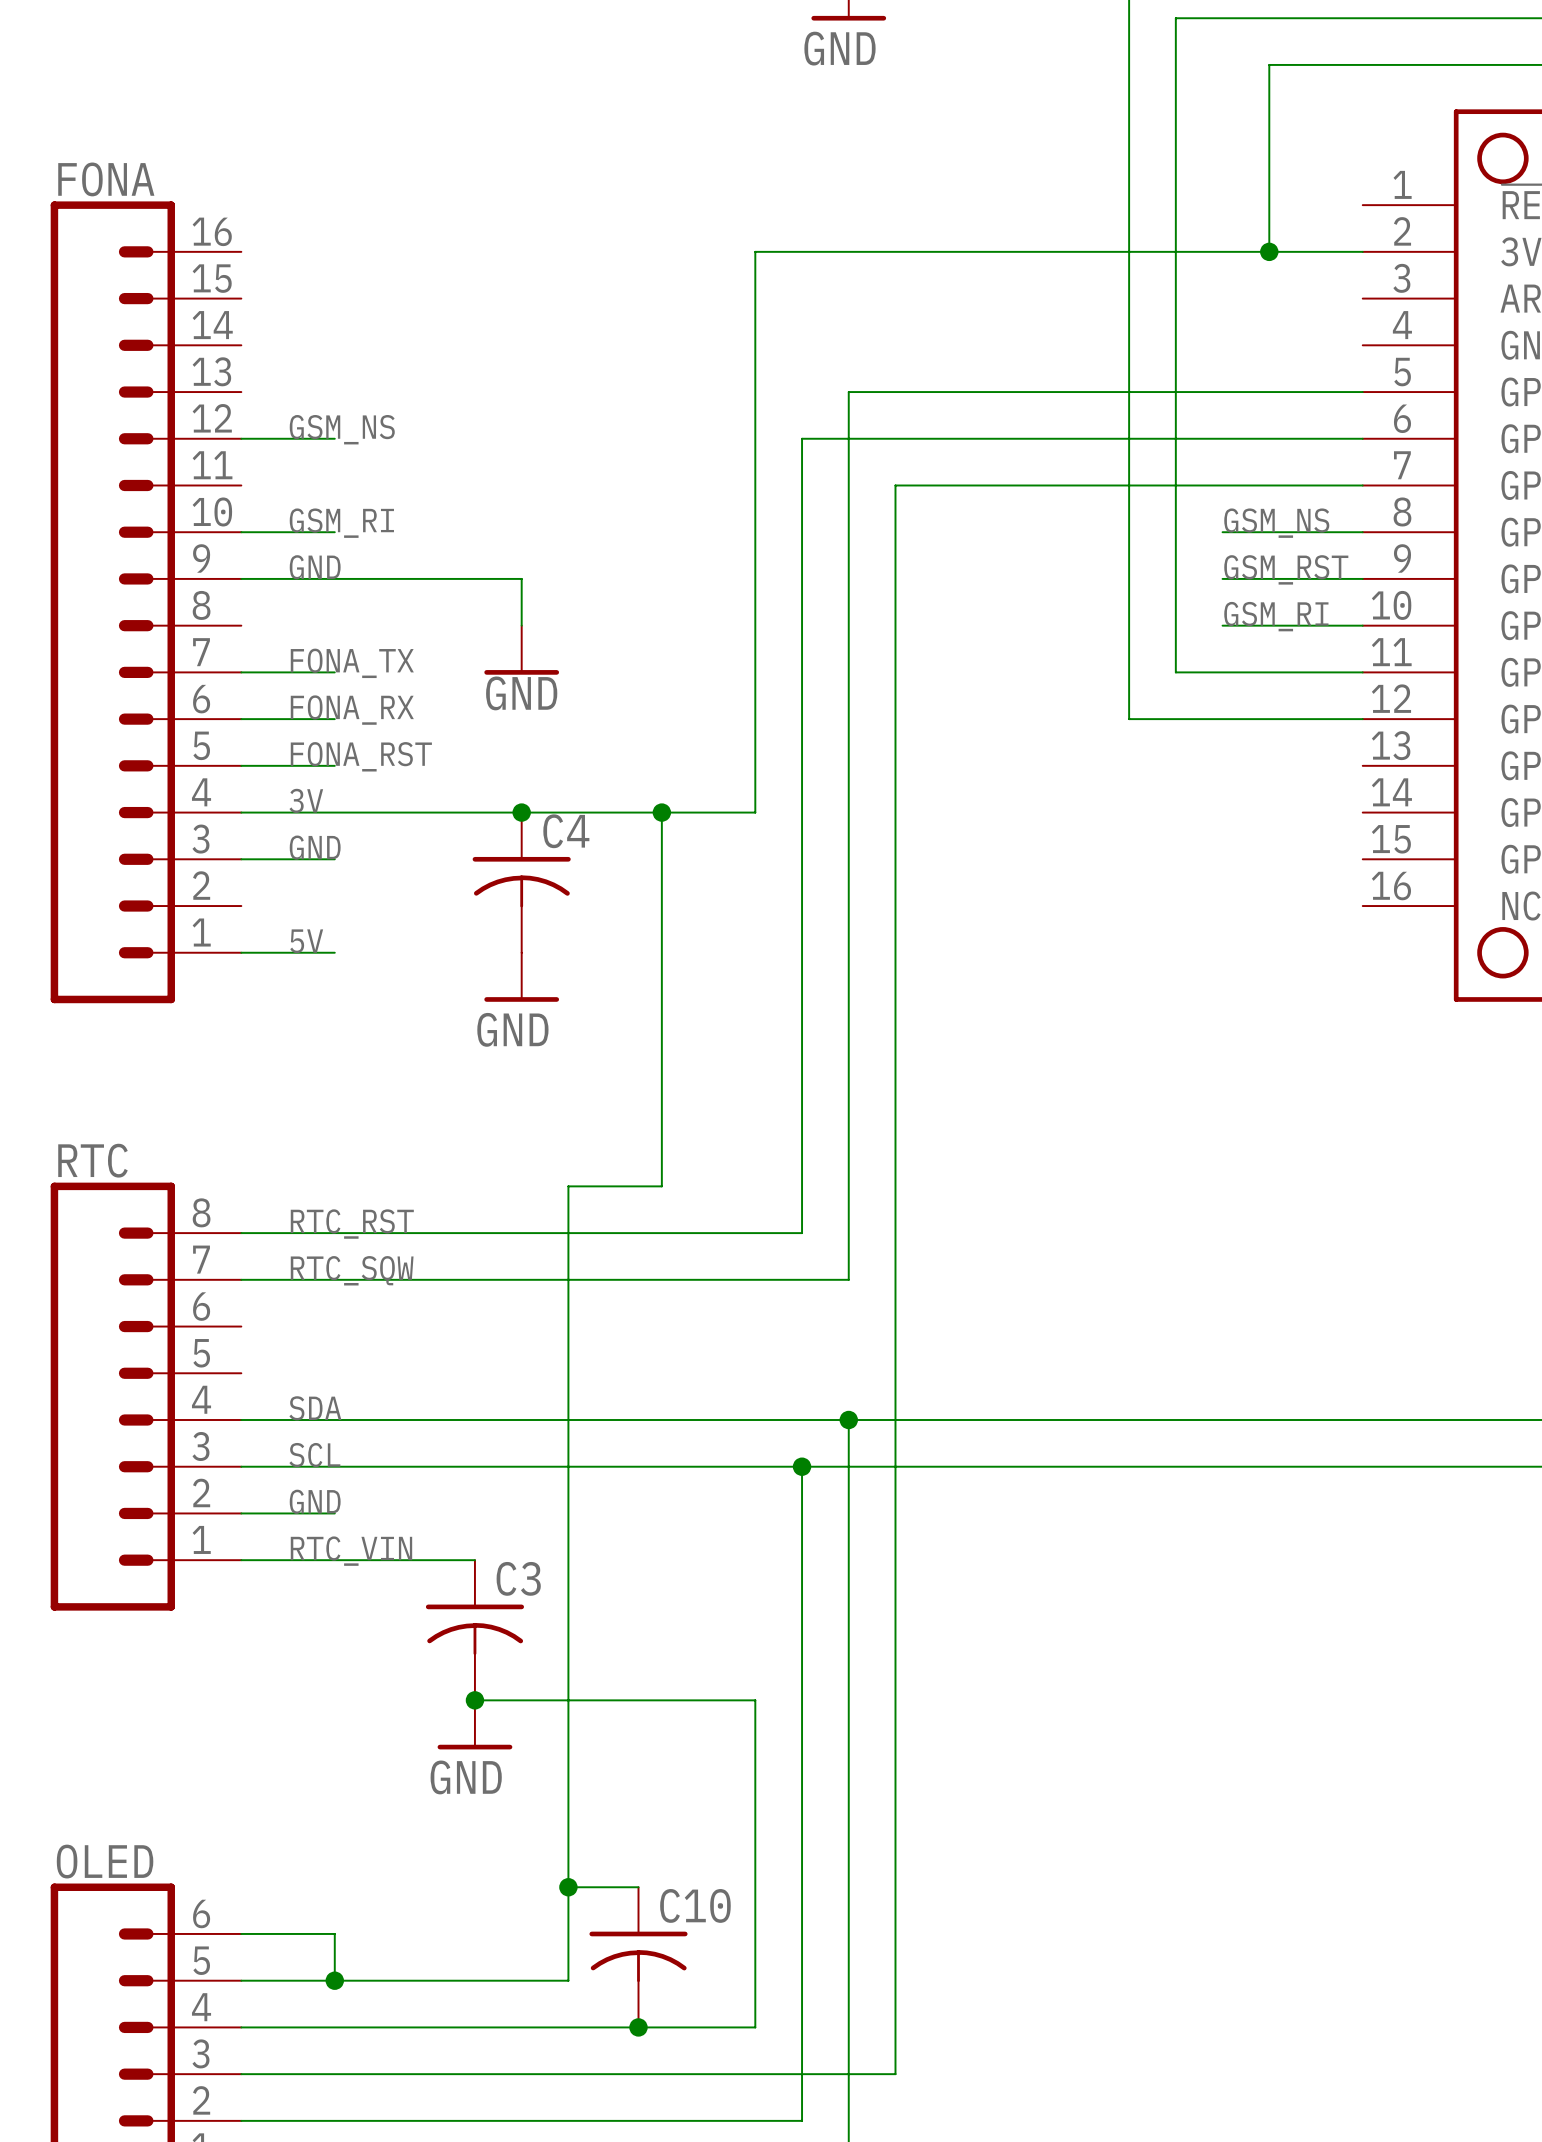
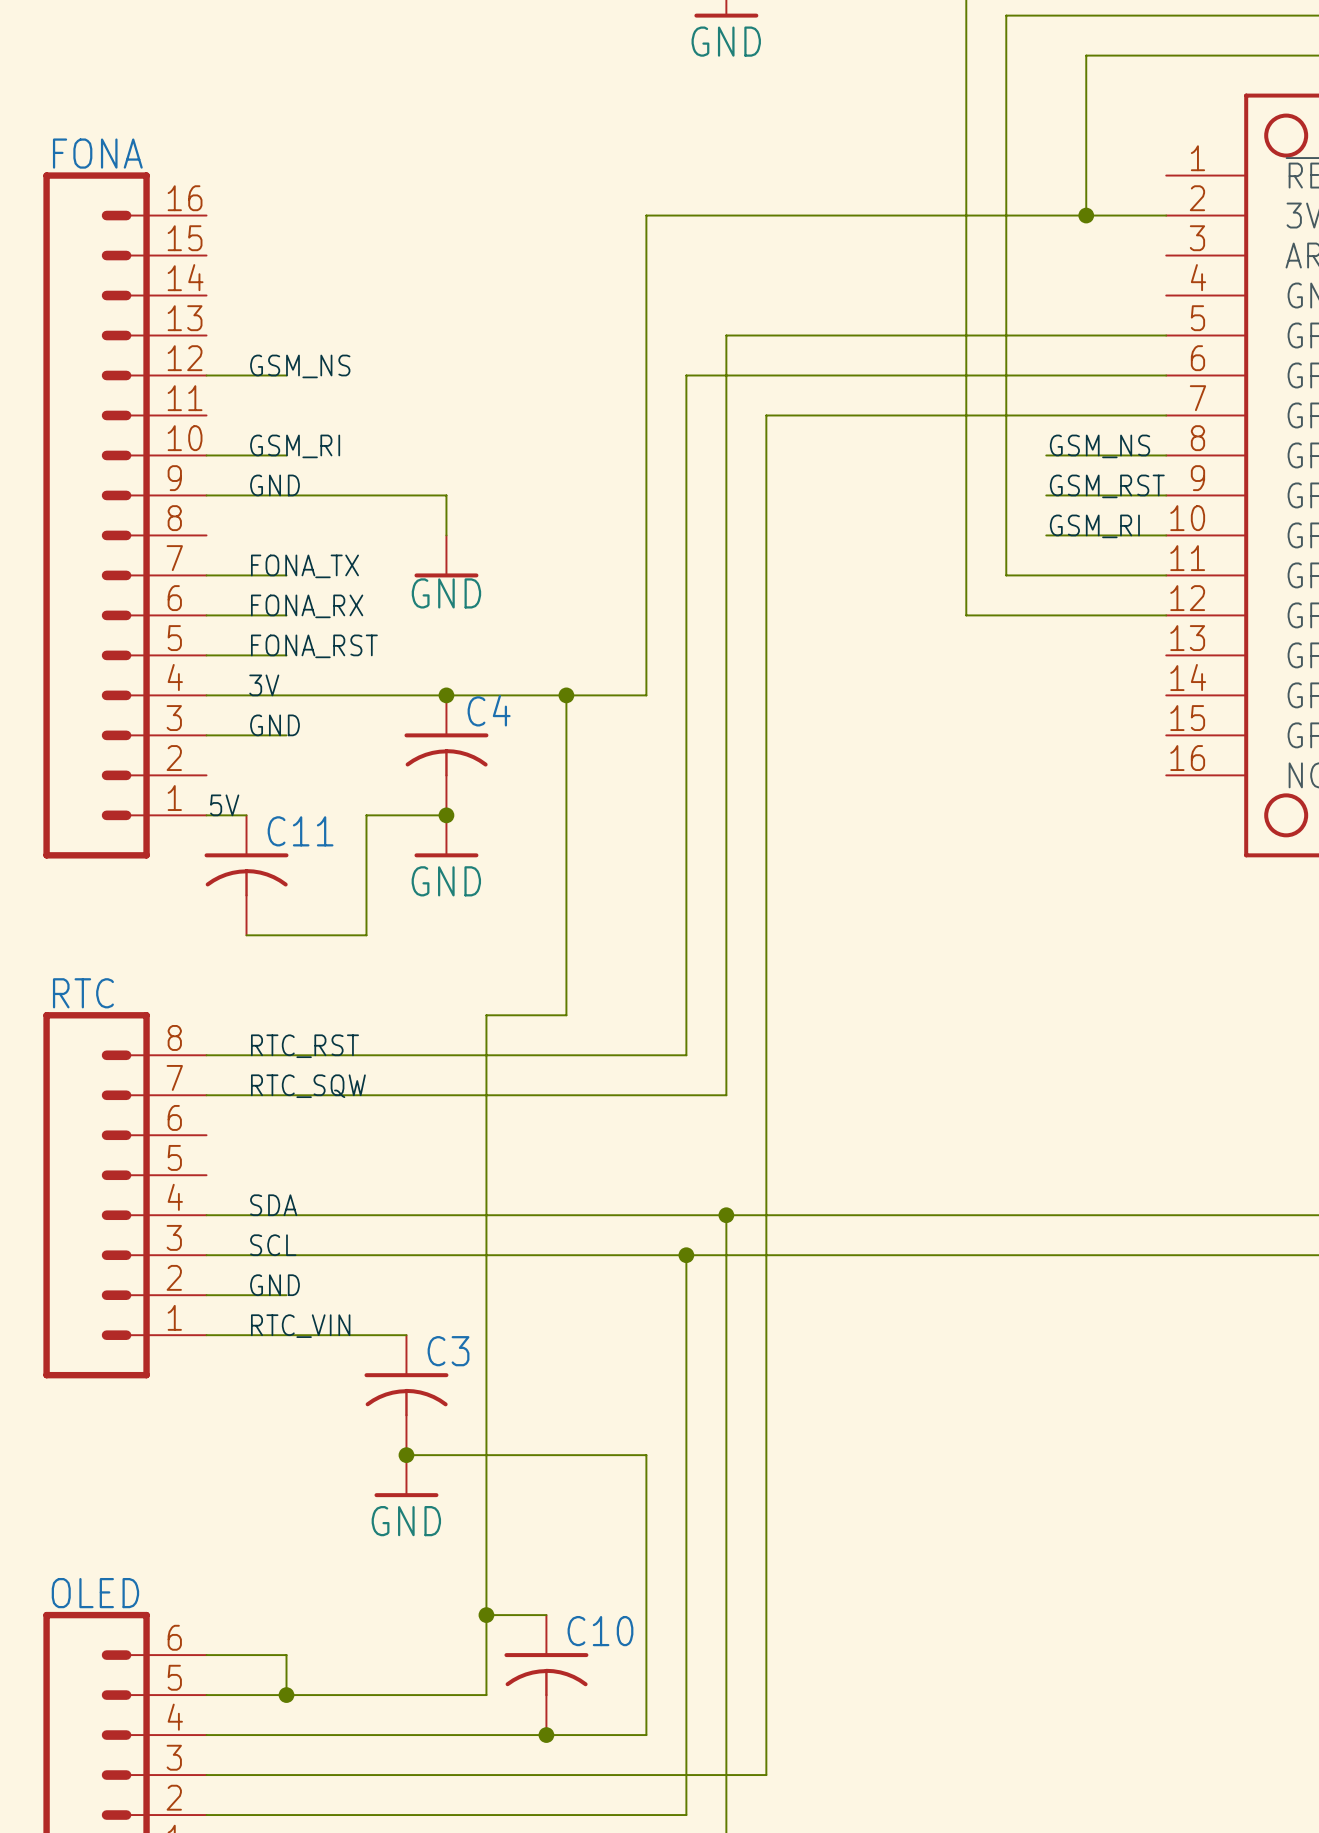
label position: 5V (306, 941) -> 5V (224, 805)
wire: (288, 952) (334, 952) -> none
wire: none -> (446, 815) (366, 815) (366, 935) (246, 935)
junction: none -> (446, 815)
C11: none -> (246, 875)

